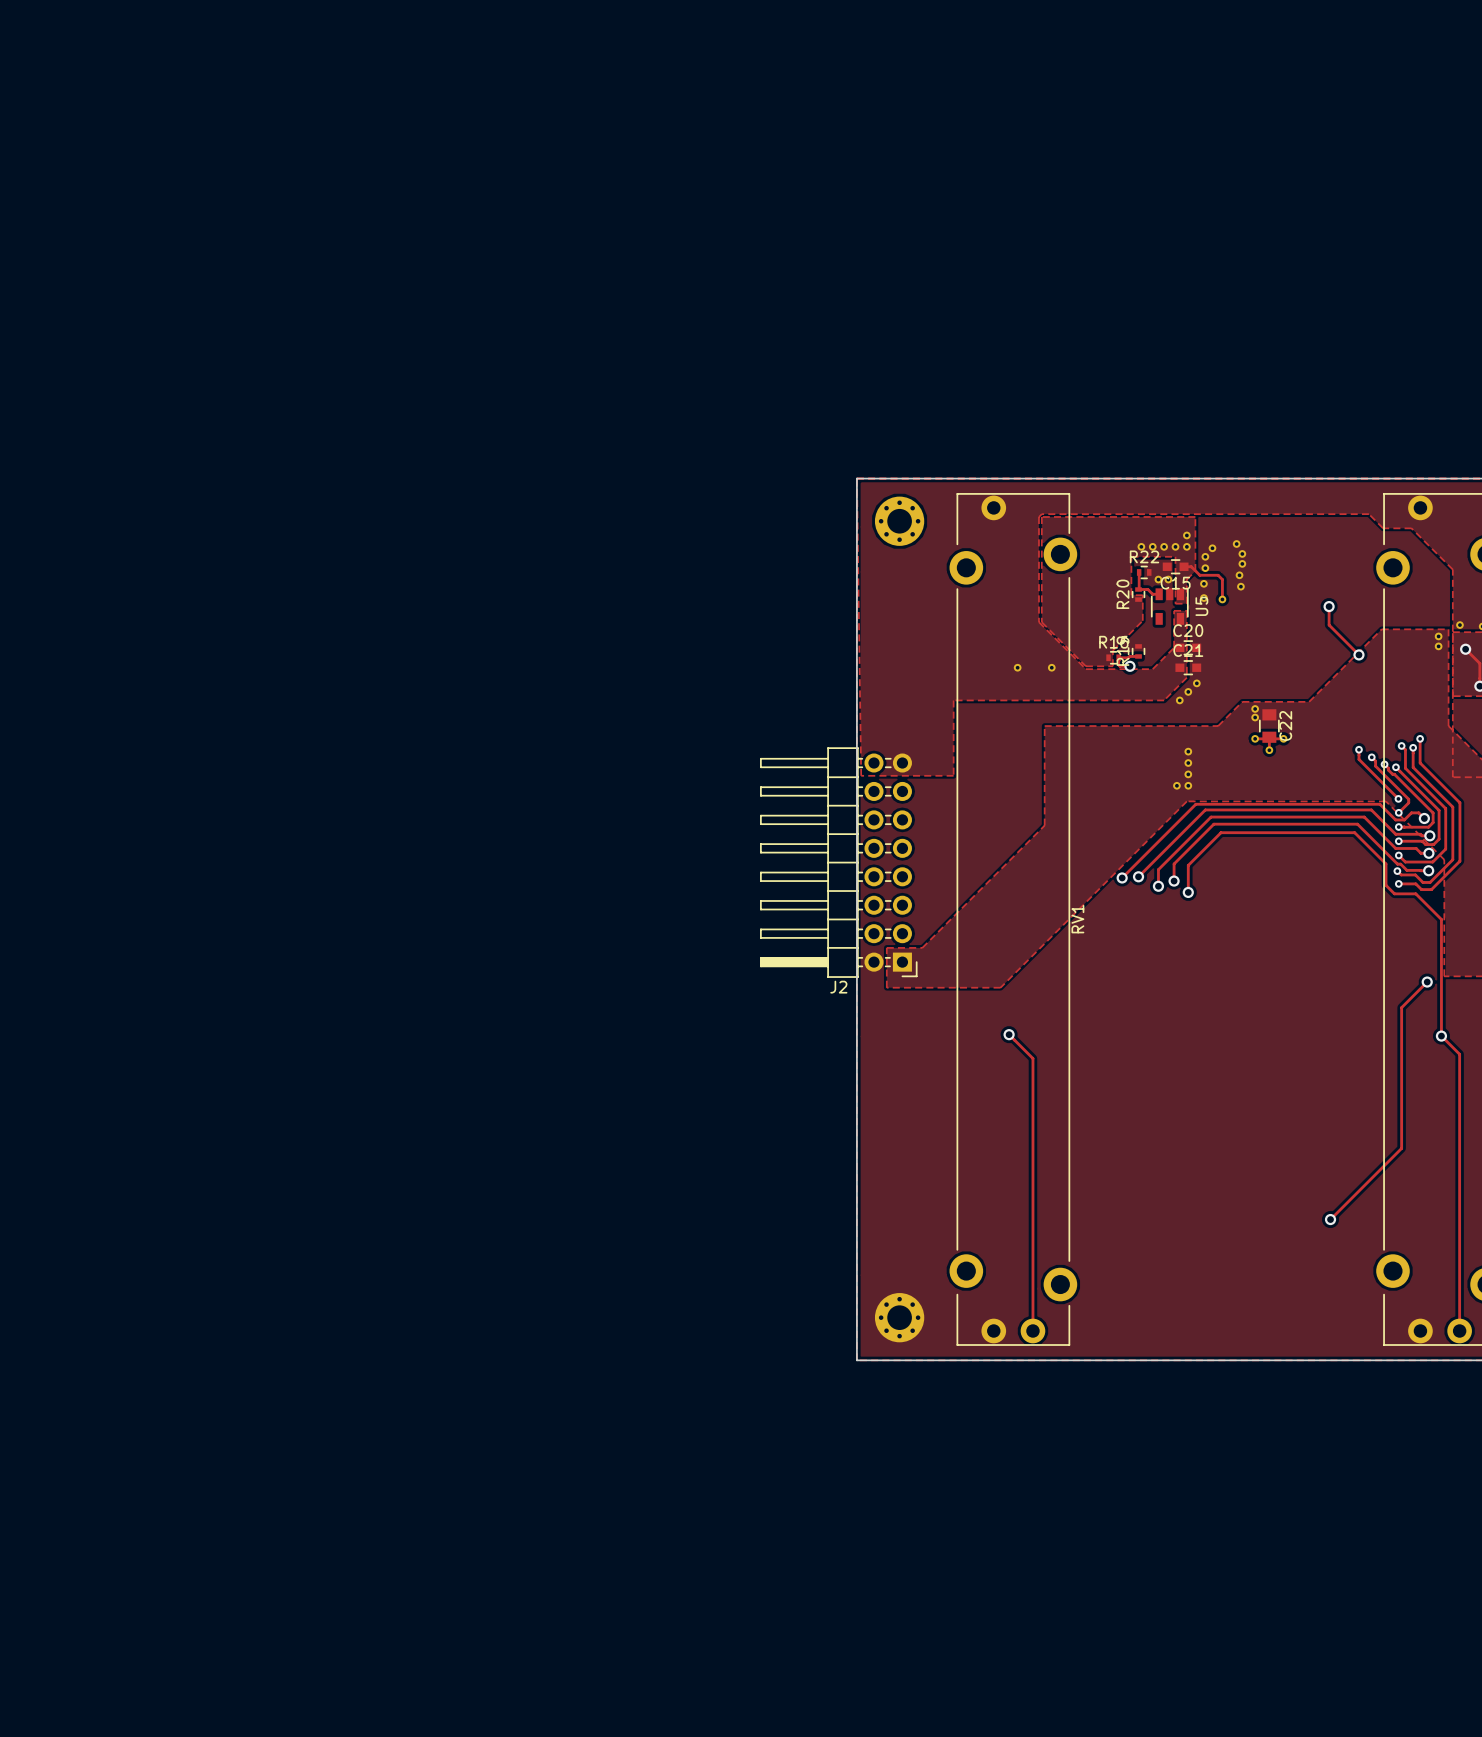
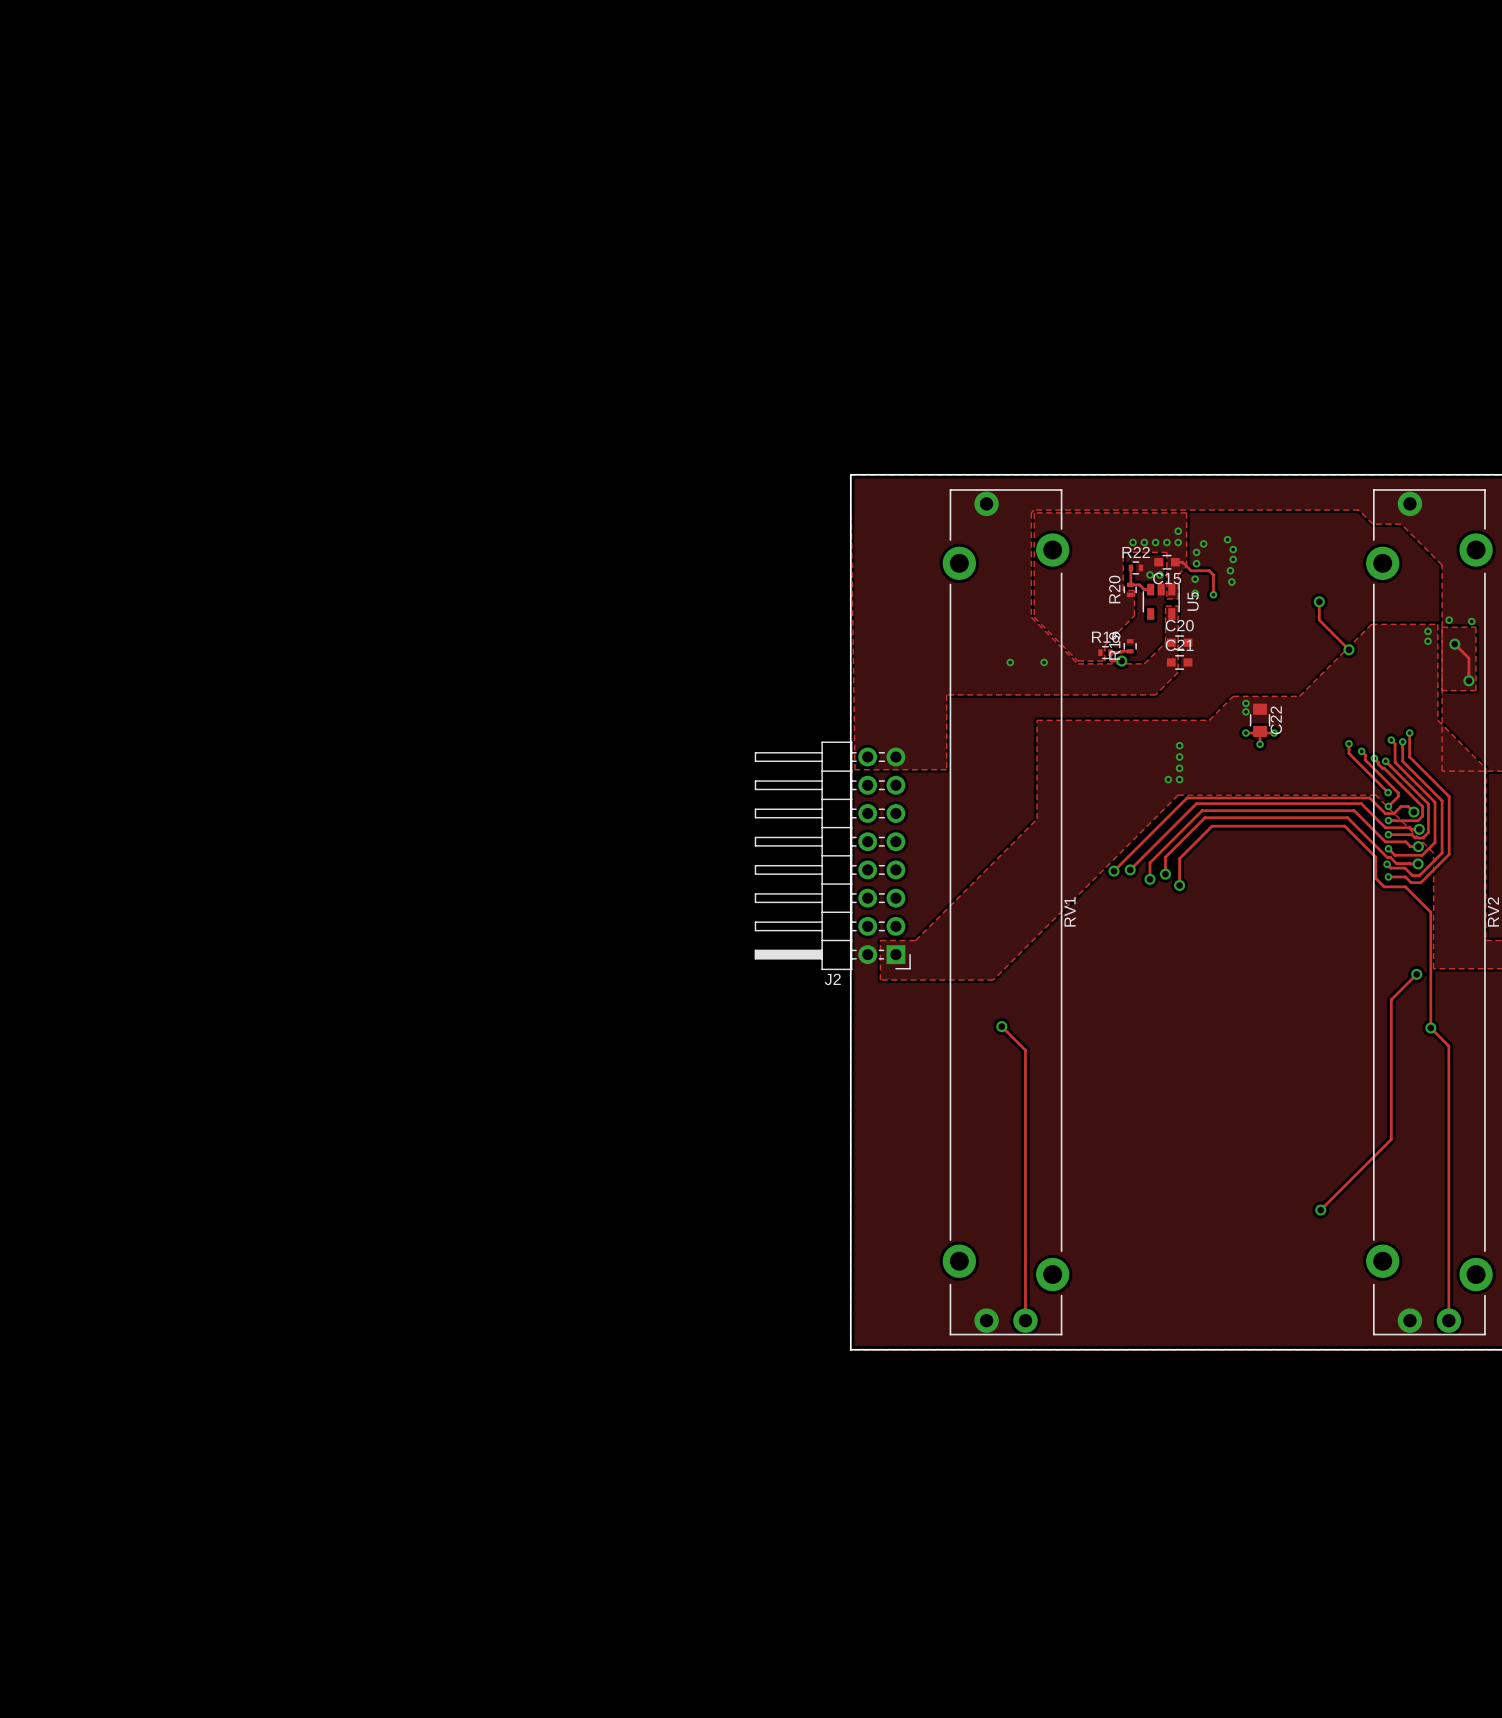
part: (899, 521) -> none
part: (1196, 683) -> none
part: (1188, 691) -> none
part: (1179, 700) -> none
part: (899, 1317) -> none

